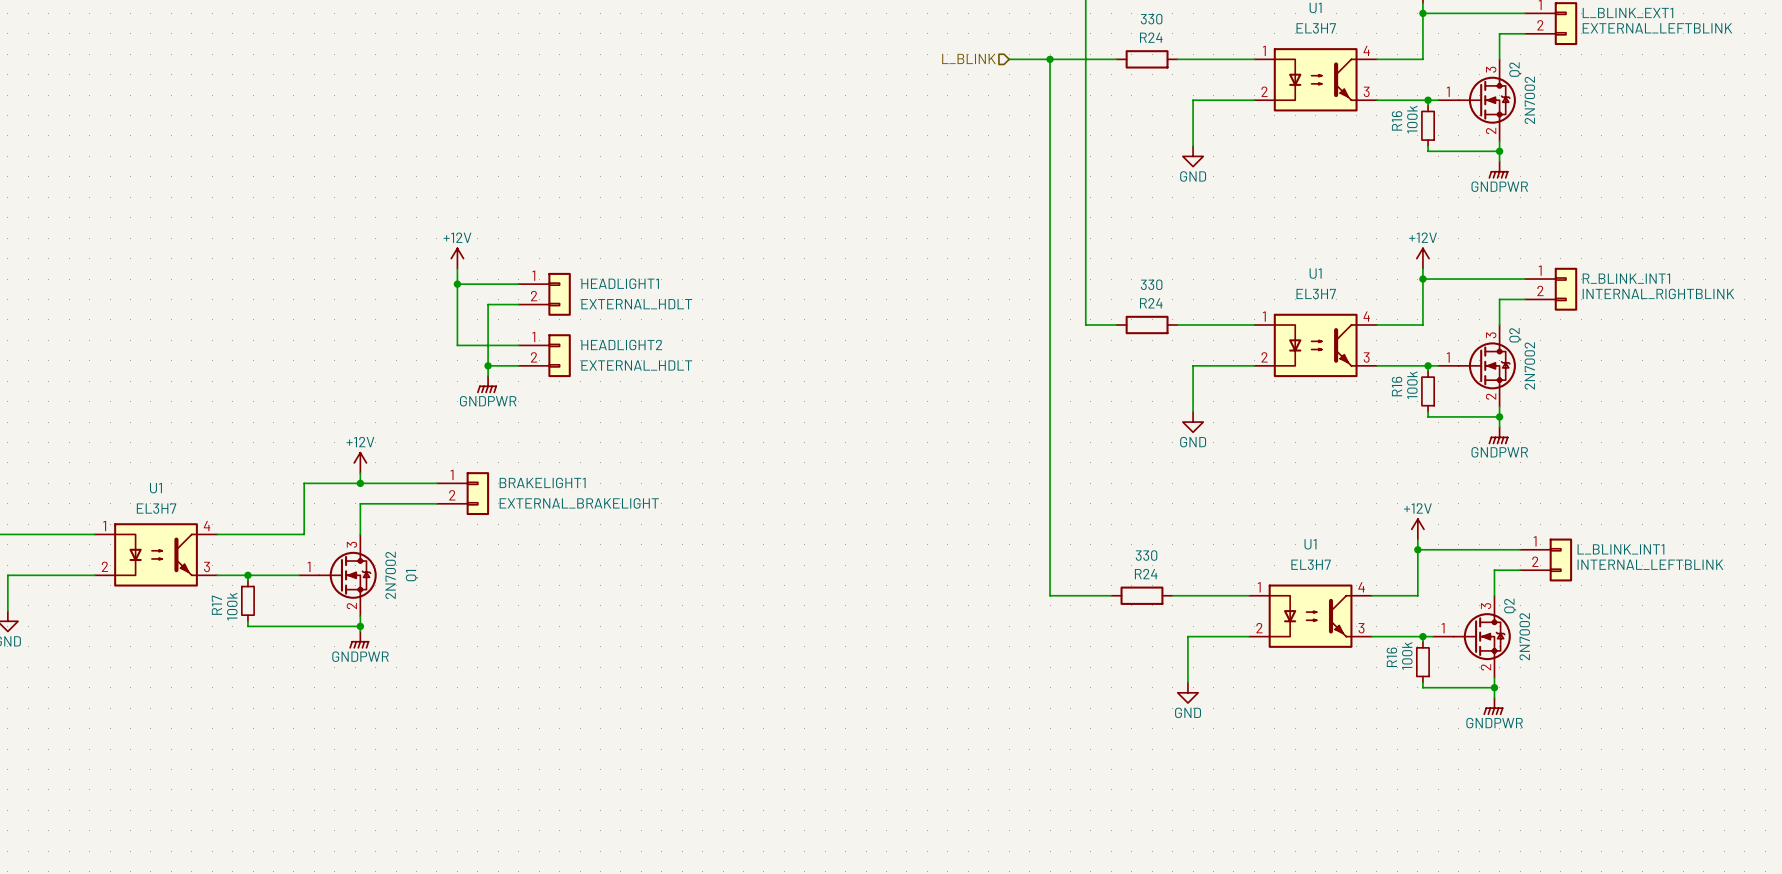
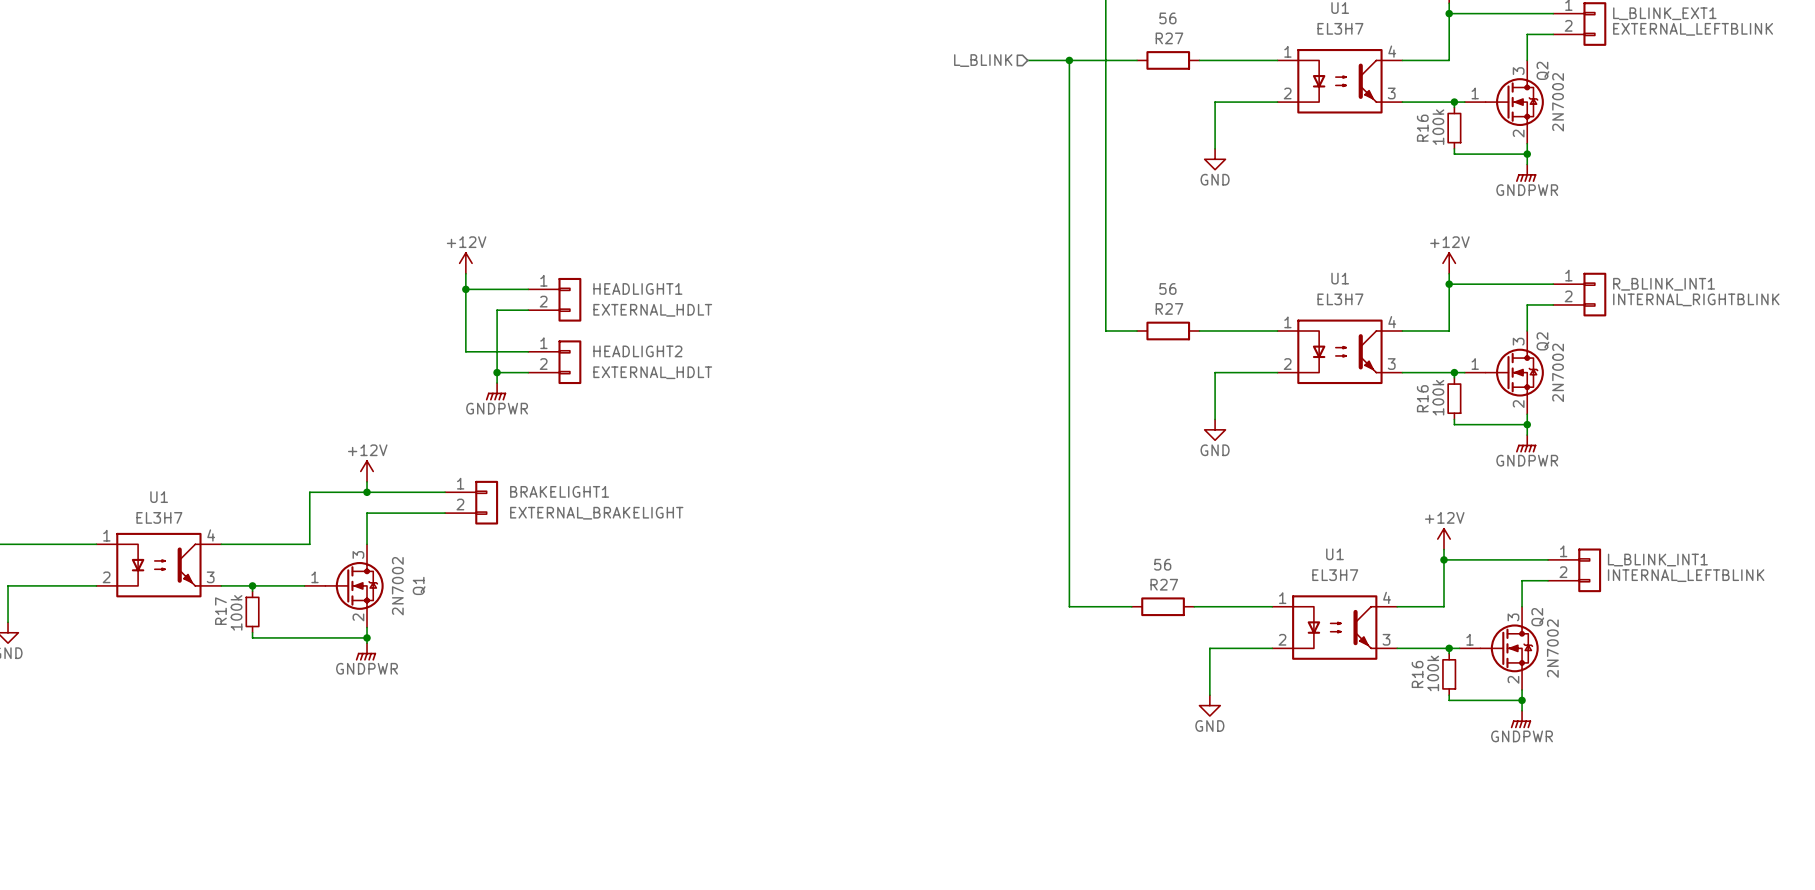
R24 value: 330 (1151, 19) -> 56 (1167, 18)
R24 name: R24 (1151, 37) -> R27 (1169, 38)
R24 value: 330 (1151, 284) -> 56 (1167, 288)
R24 name: R24 (1151, 303) -> R27 (1169, 308)
R24 value: 330 (1146, 555) -> 56 (1162, 564)
R24 name: R24 (1146, 574) -> R27 (1164, 584)

